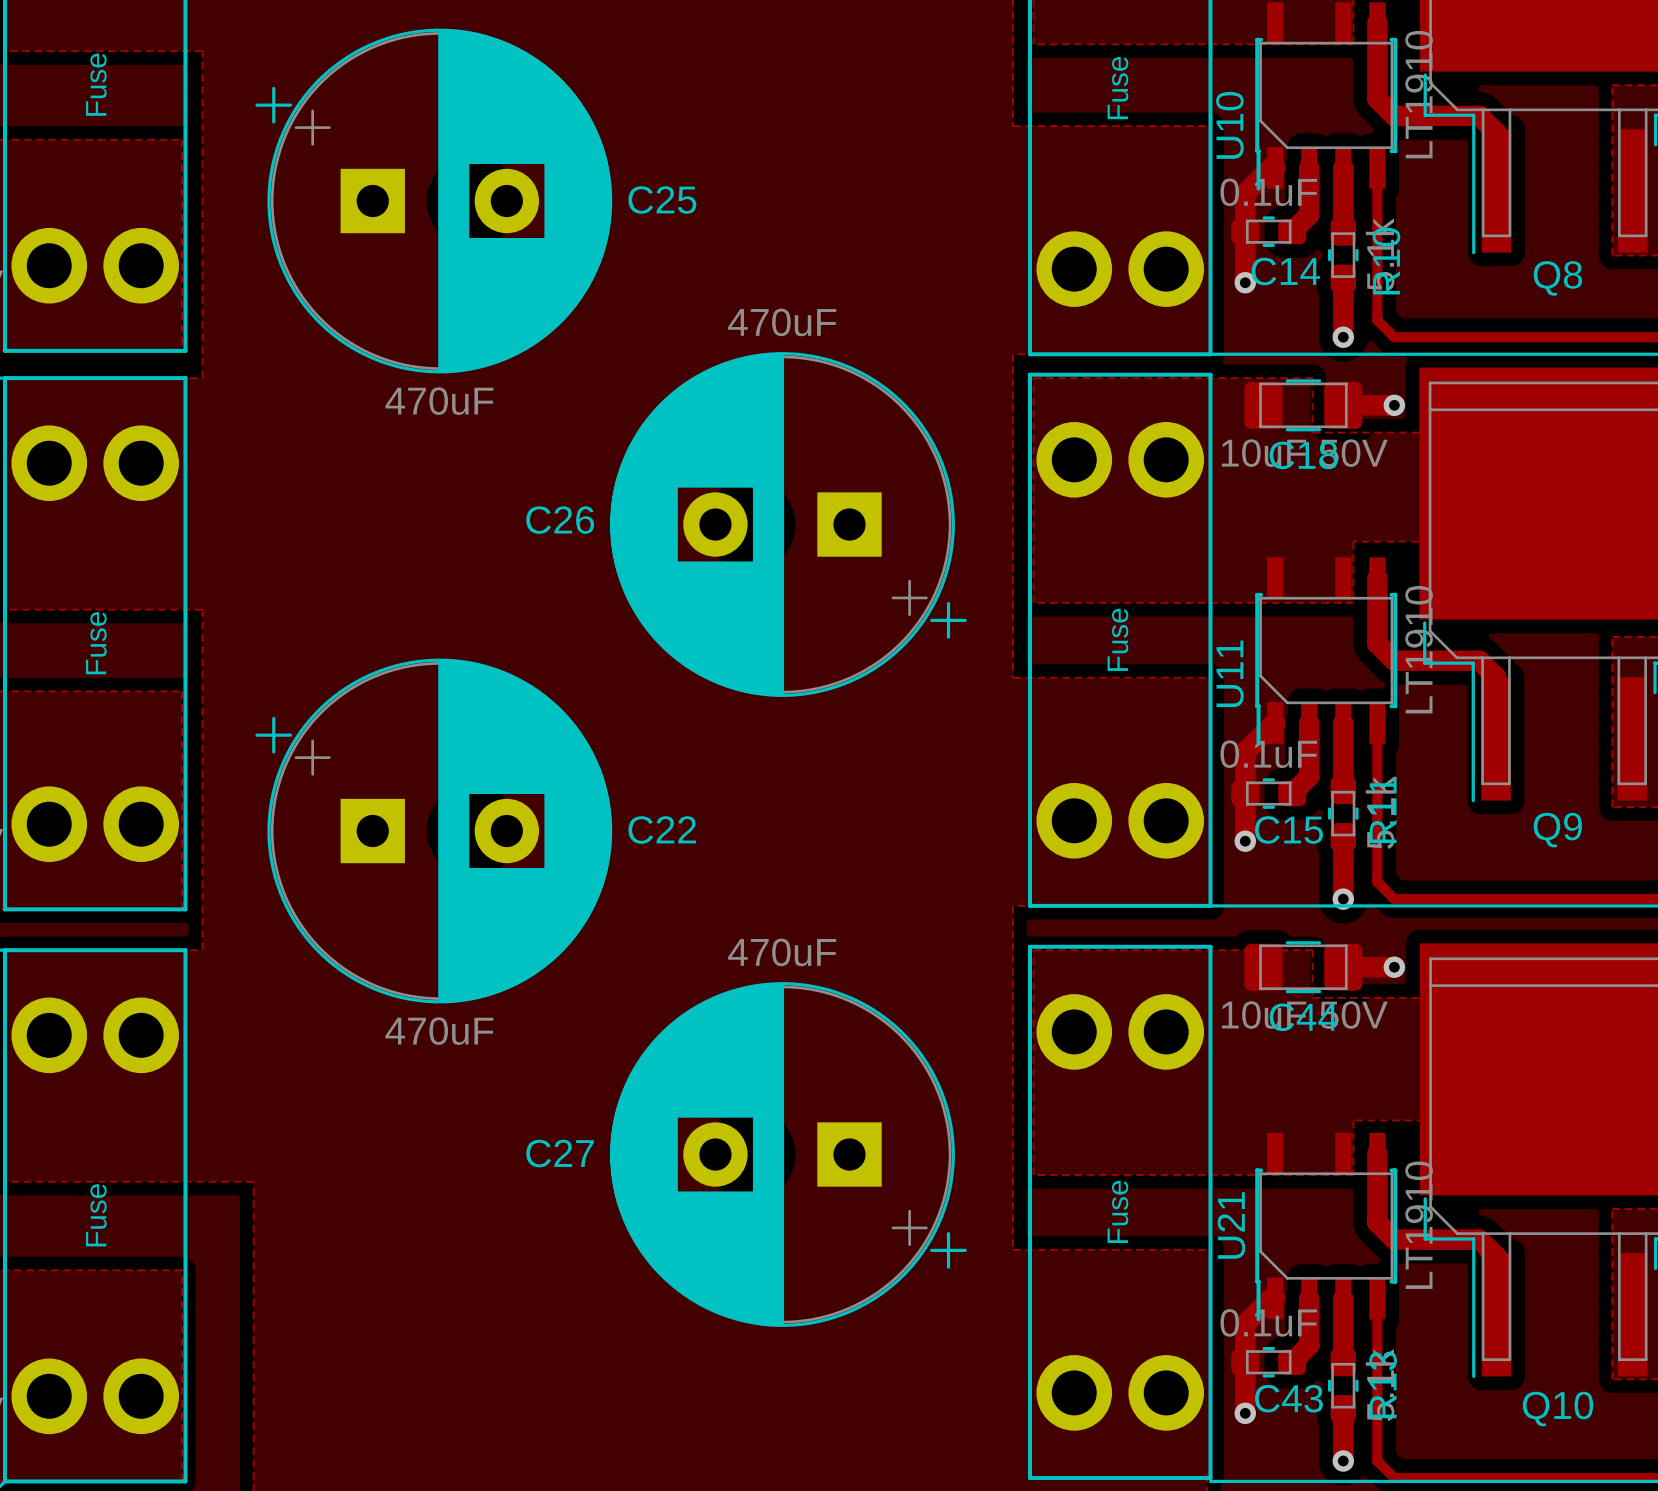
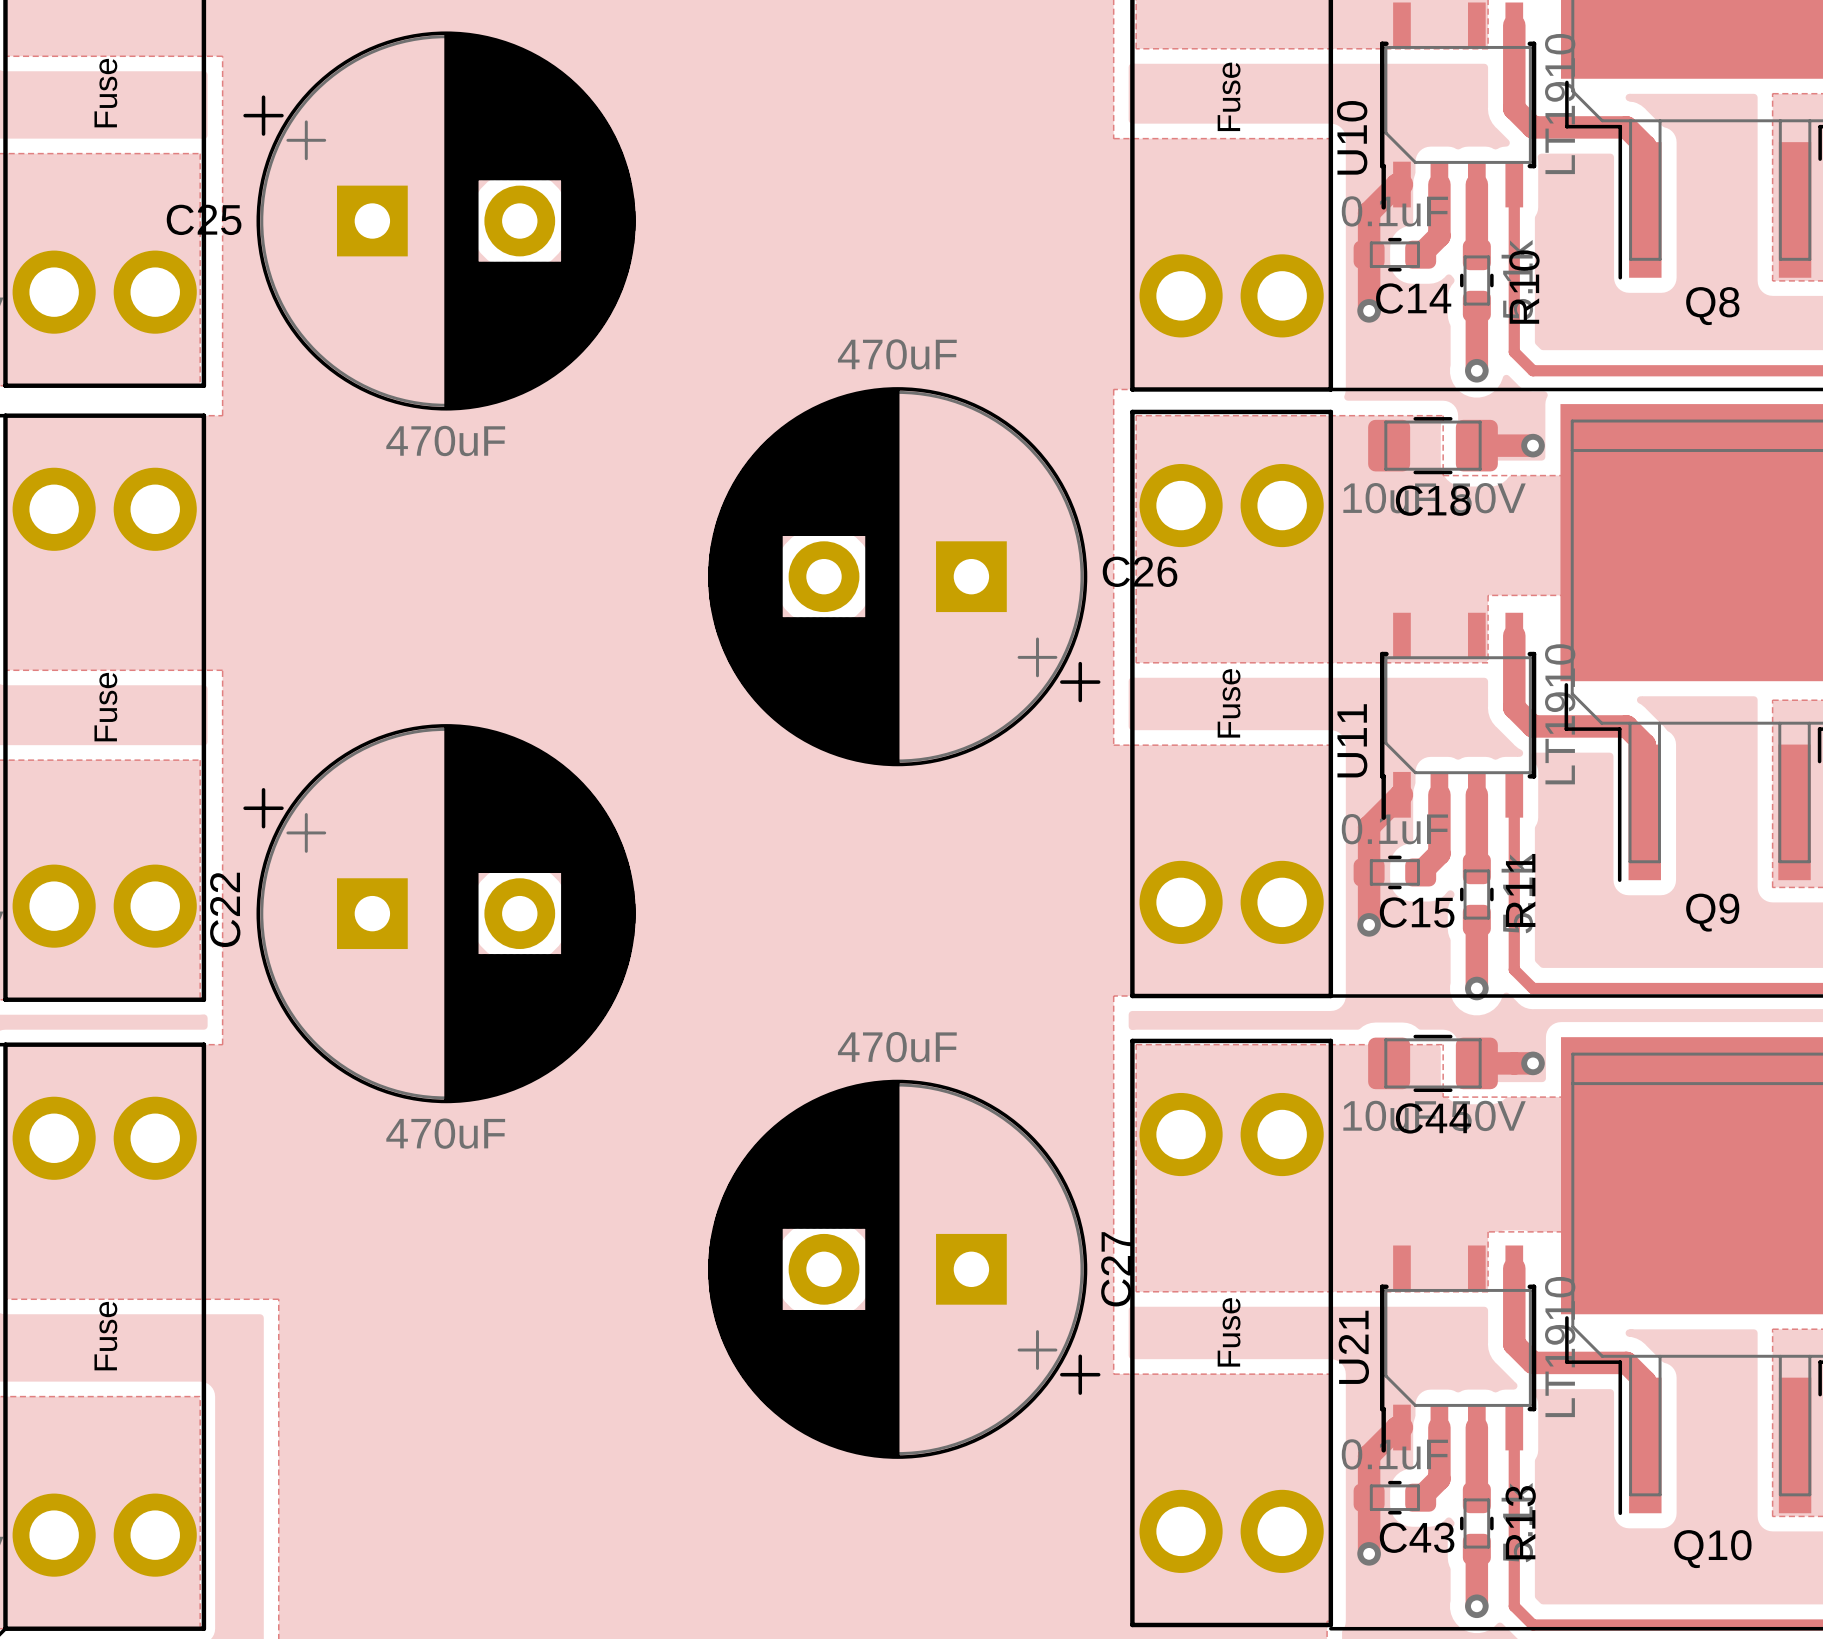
C25 name position: C25 (662, 200) -> C25 (204, 219)
C25 position: (433, 201) -> (439, 221)
C26 name position: C26 (560, 520) -> C26 (1140, 571)
C26 position: (788, 524) -> (904, 576)
C22 name rotation: 0° (662, 830) -> 90° counterclockwise (225, 909)
C22 name position: C22 (662, 830) -> C22 (225, 909)
C22 position: (433, 831) -> (439, 913)
C27 name rotation: 0° (560, 1153) -> 90° counterclockwise (1116, 1269)
C27 name position: C27 (560, 1153) -> C27 (1116, 1269)
C27 position: (788, 1154) -> (904, 1269)

